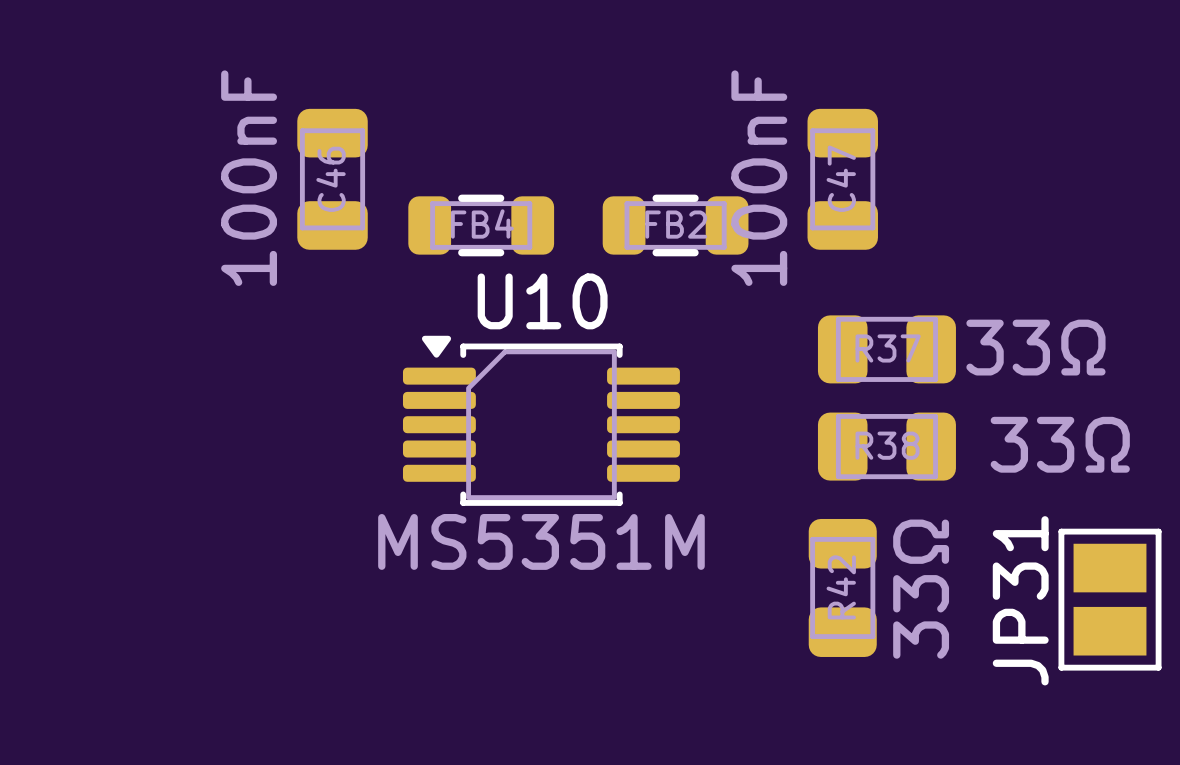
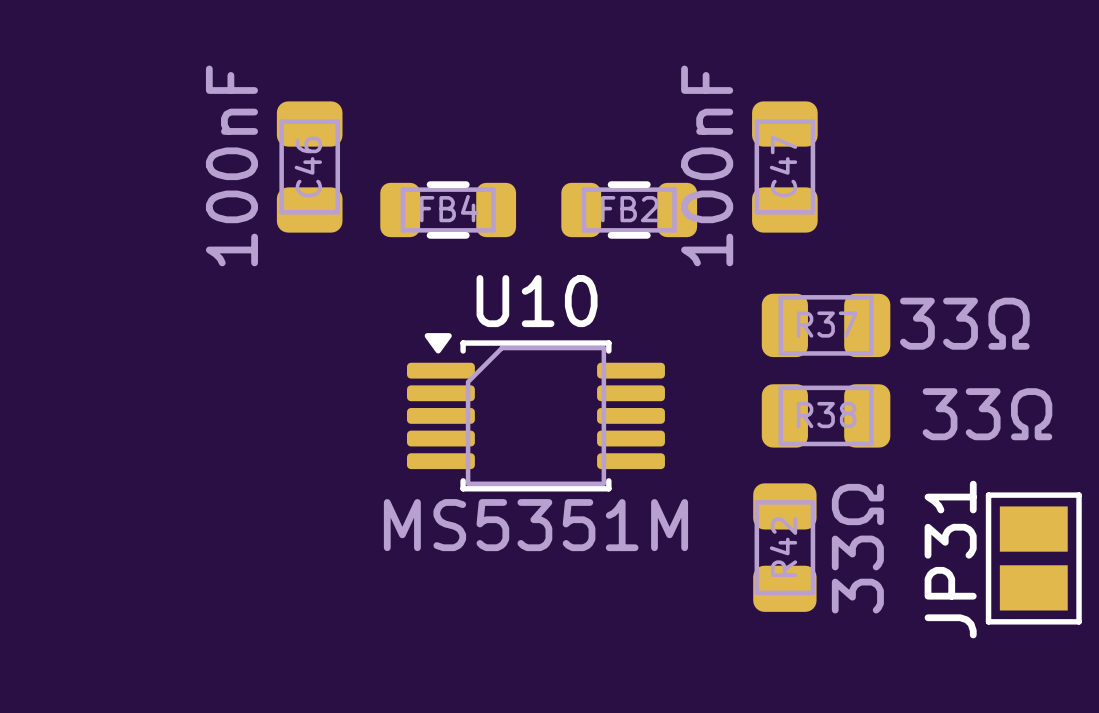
U10 position: (541, 420) -> (535, 412)

